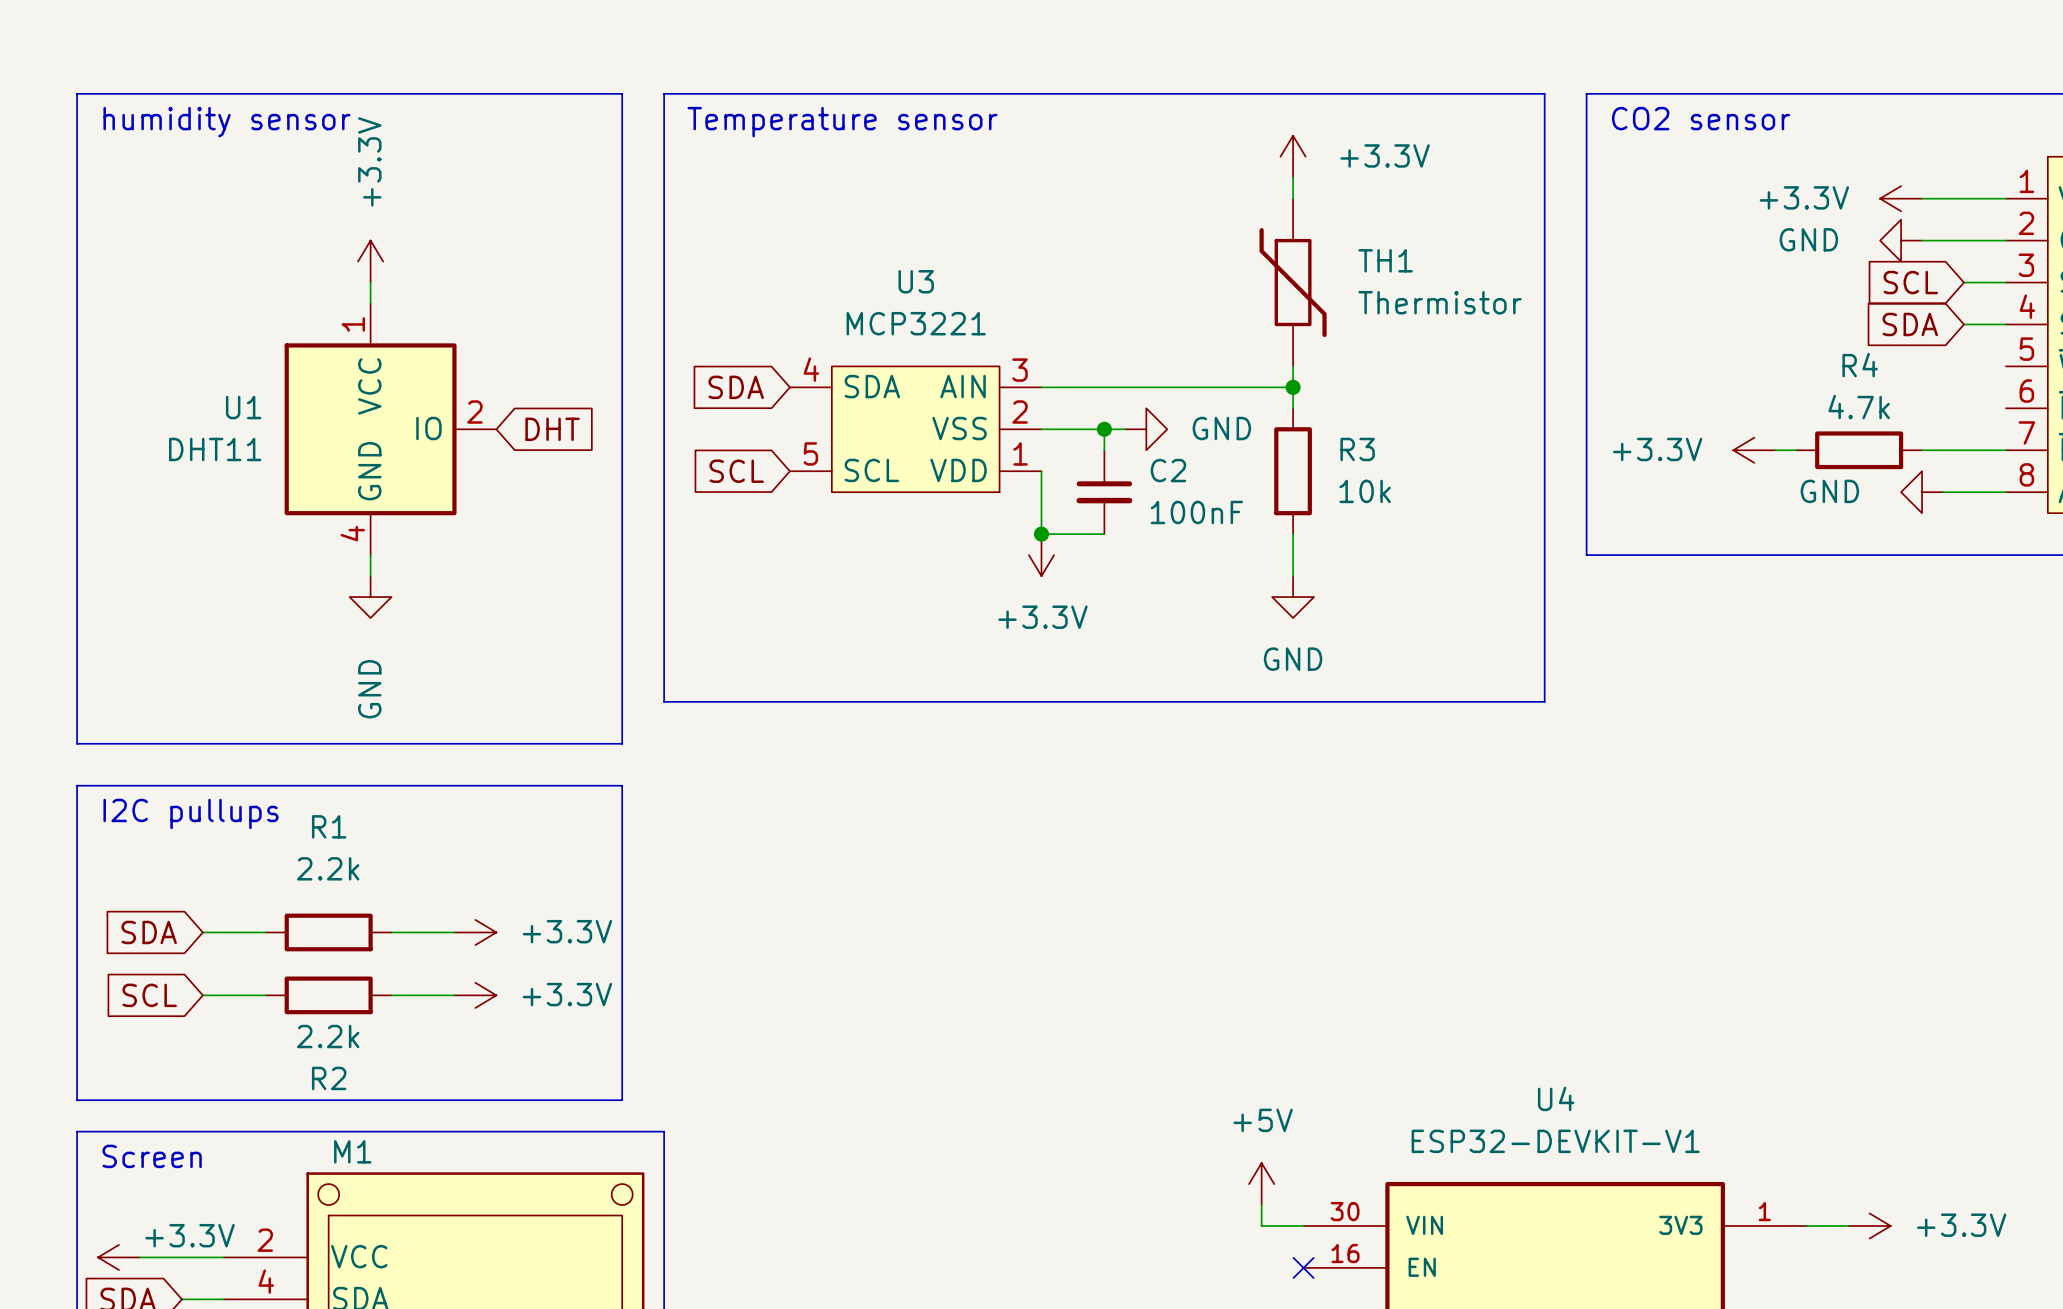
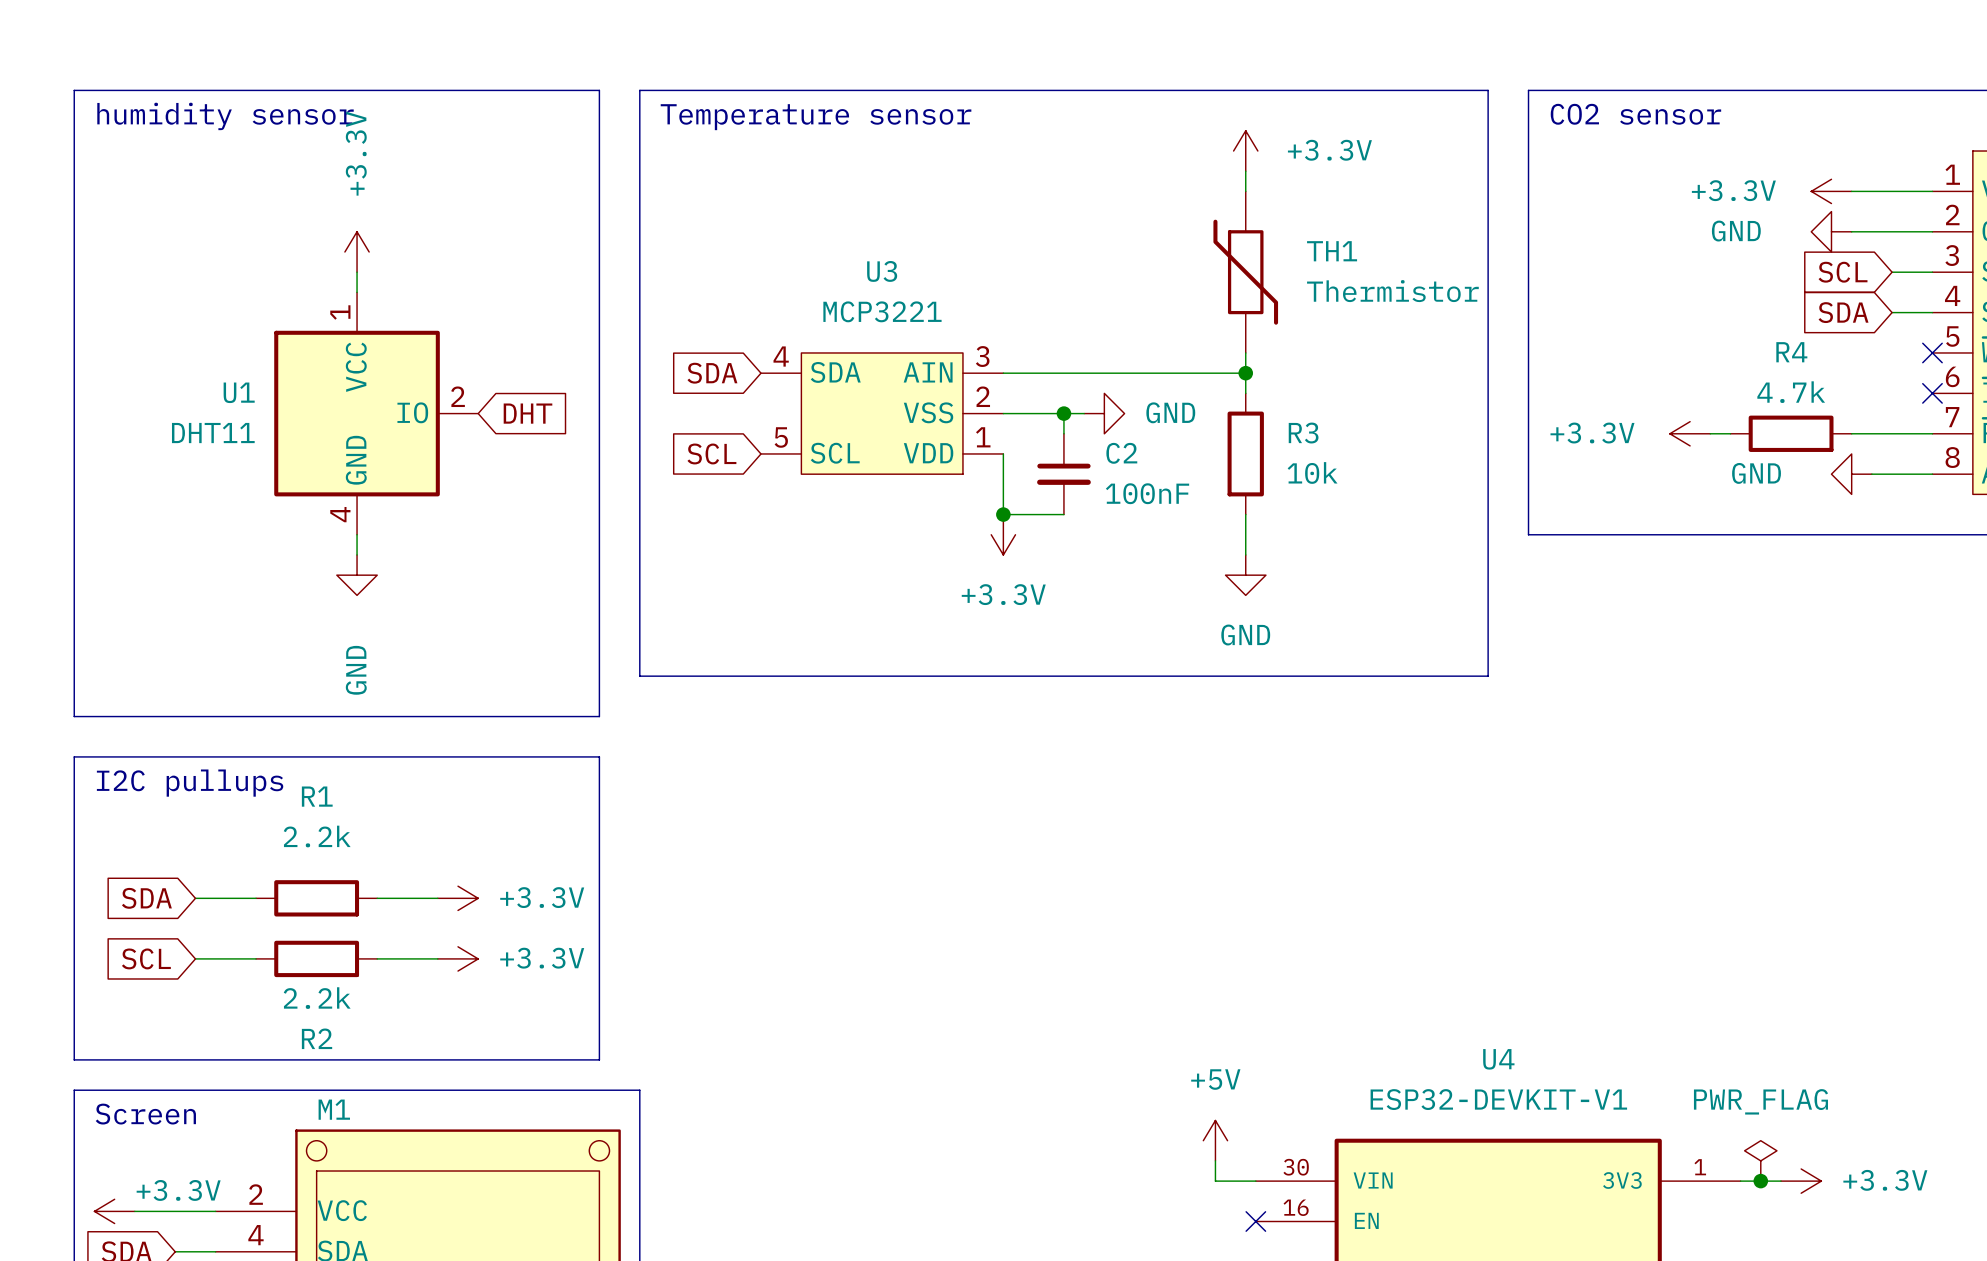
no-connect mark: none -> (1932, 352)
no-connect mark: none -> (1932, 393)
power symbol: none -> PWR_FLAG (1760, 1160)
junction: none -> (1760, 1181)

